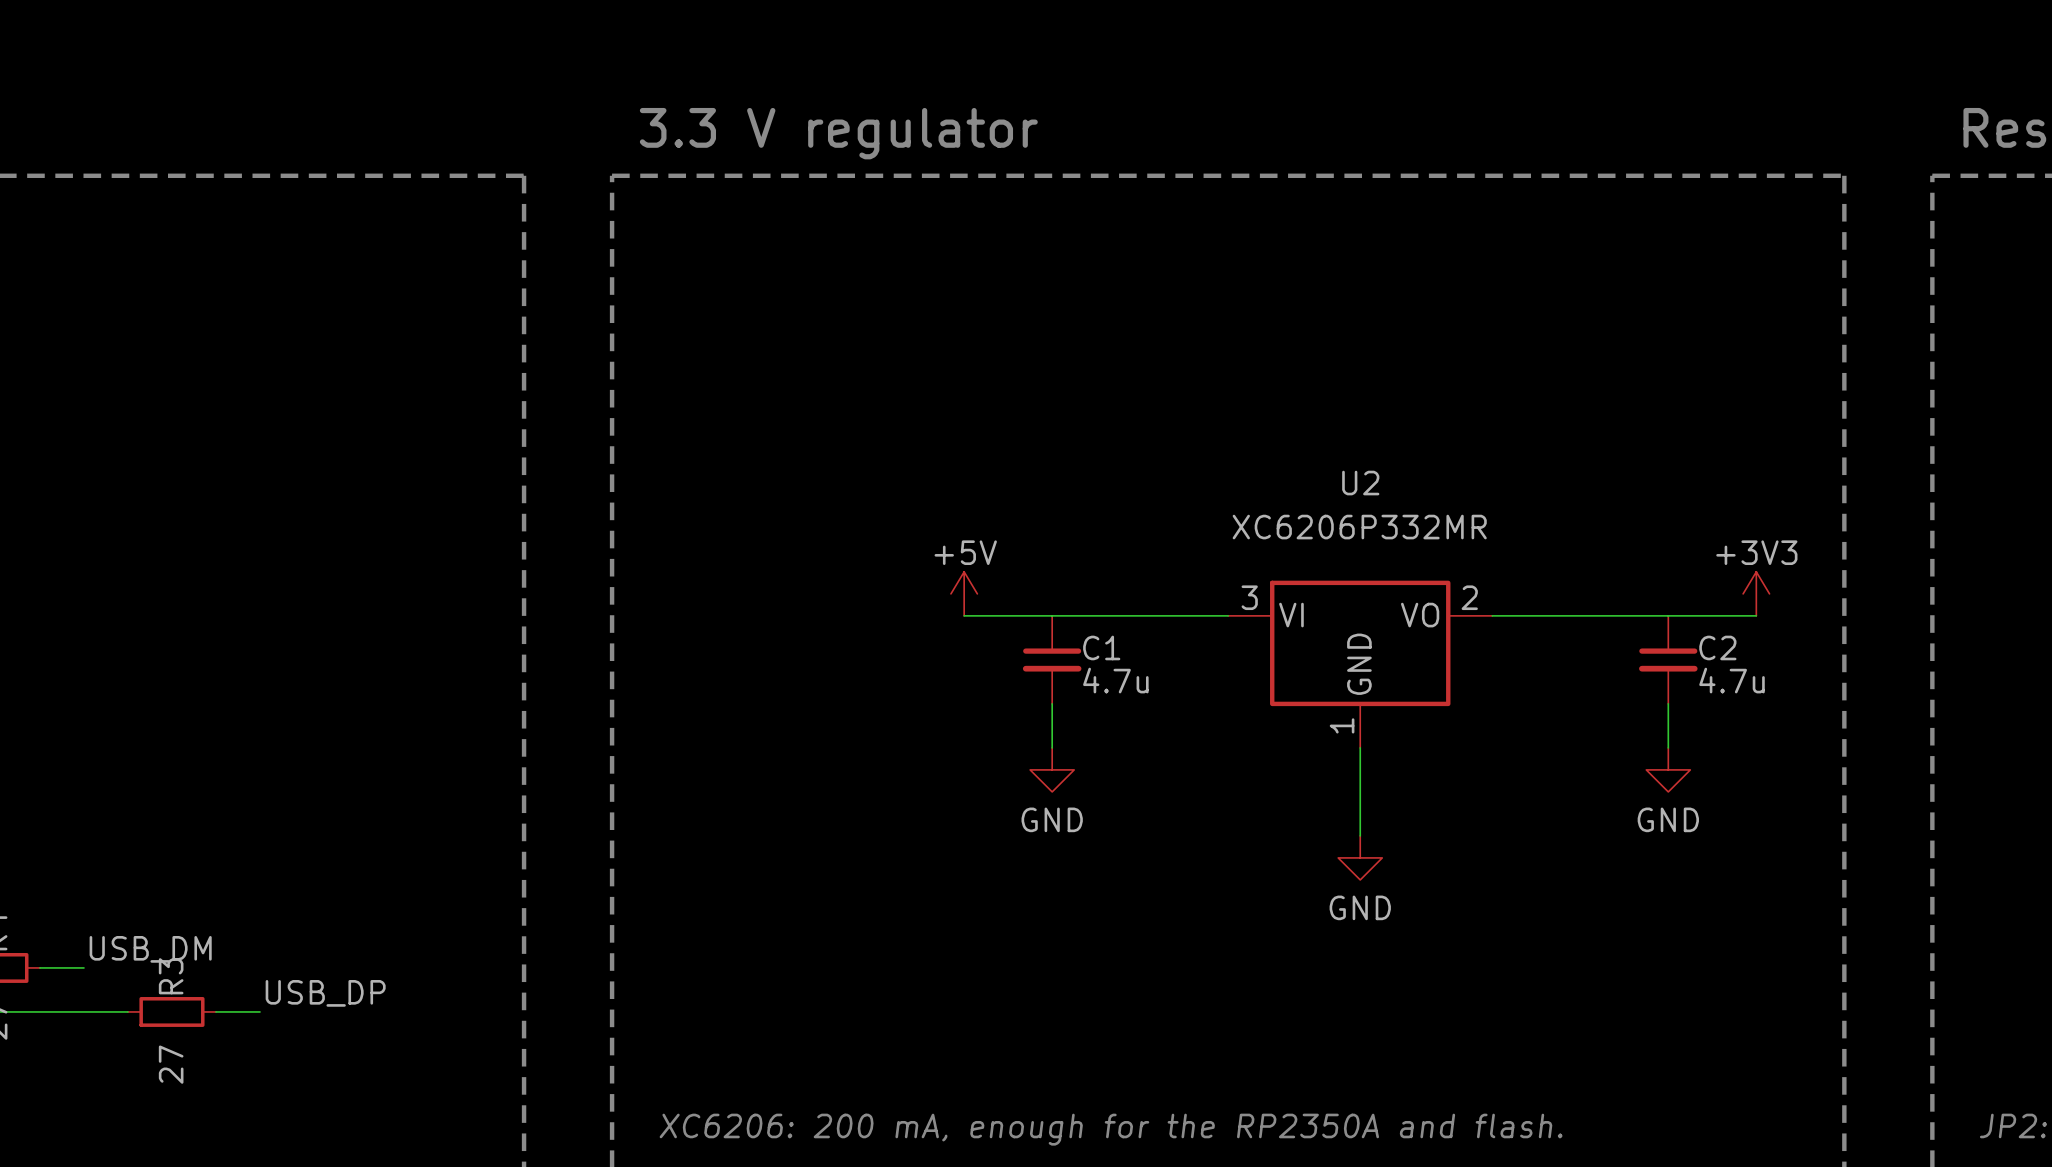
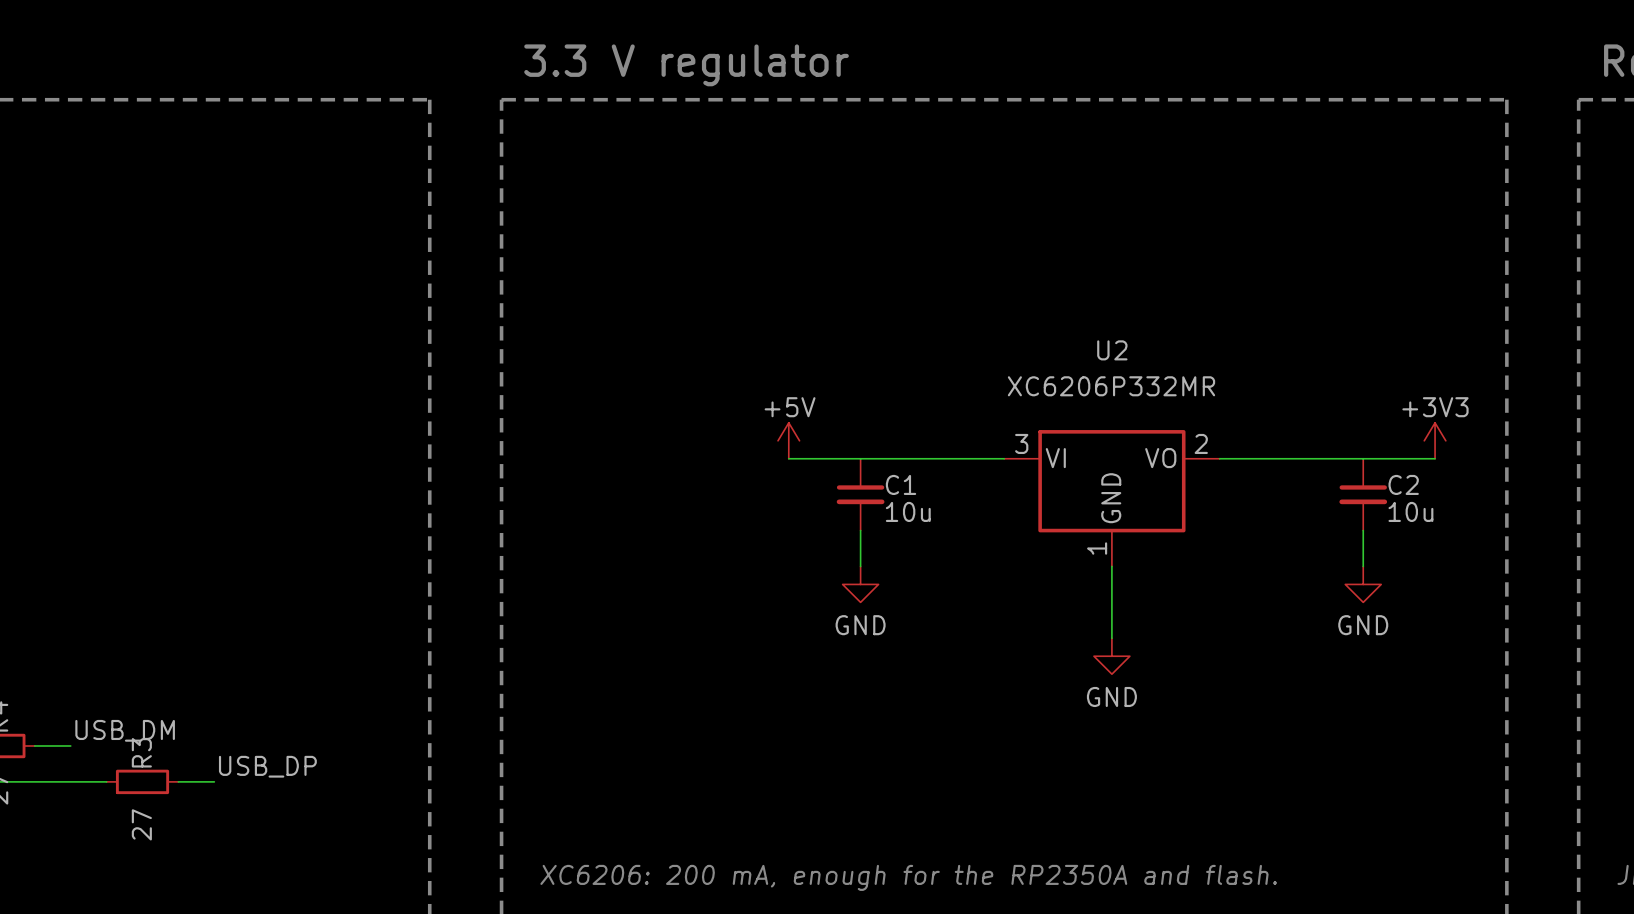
C1 value: 4.7u (1115, 680) -> 10u (908, 511)
C2 value: 4.7u (1732, 680) -> 10u (1410, 511)

